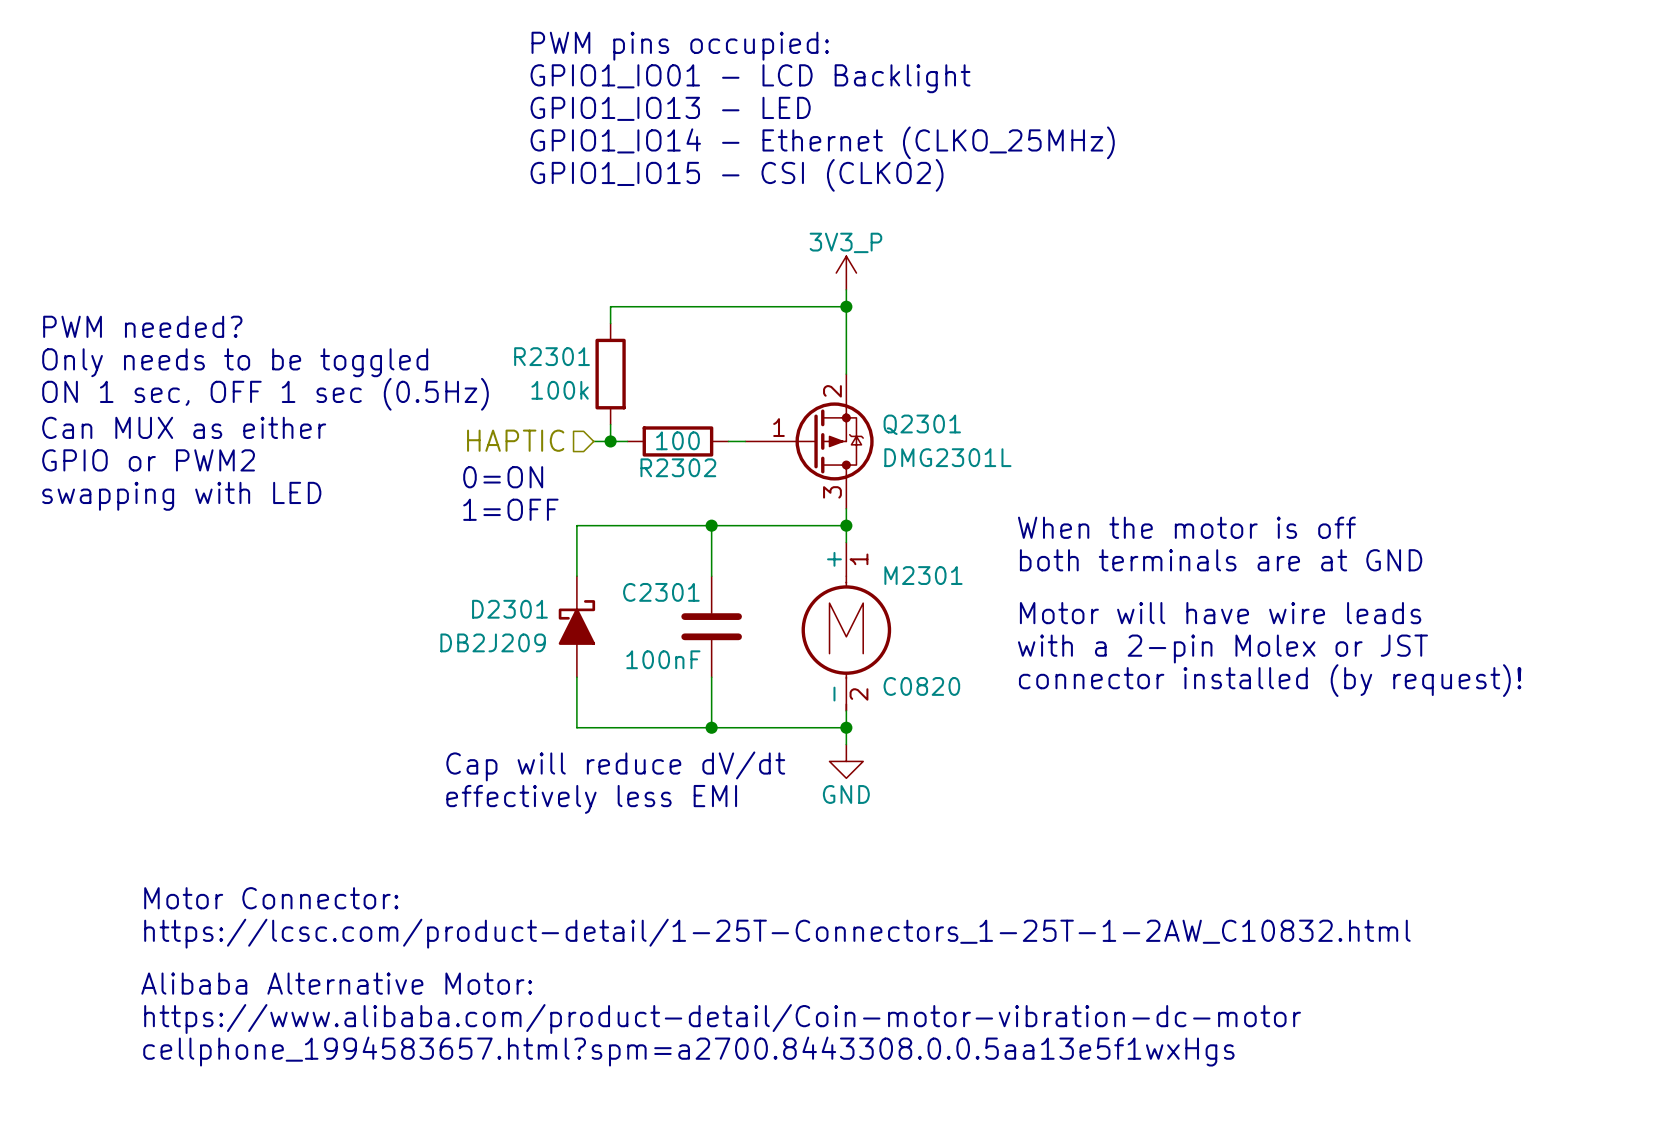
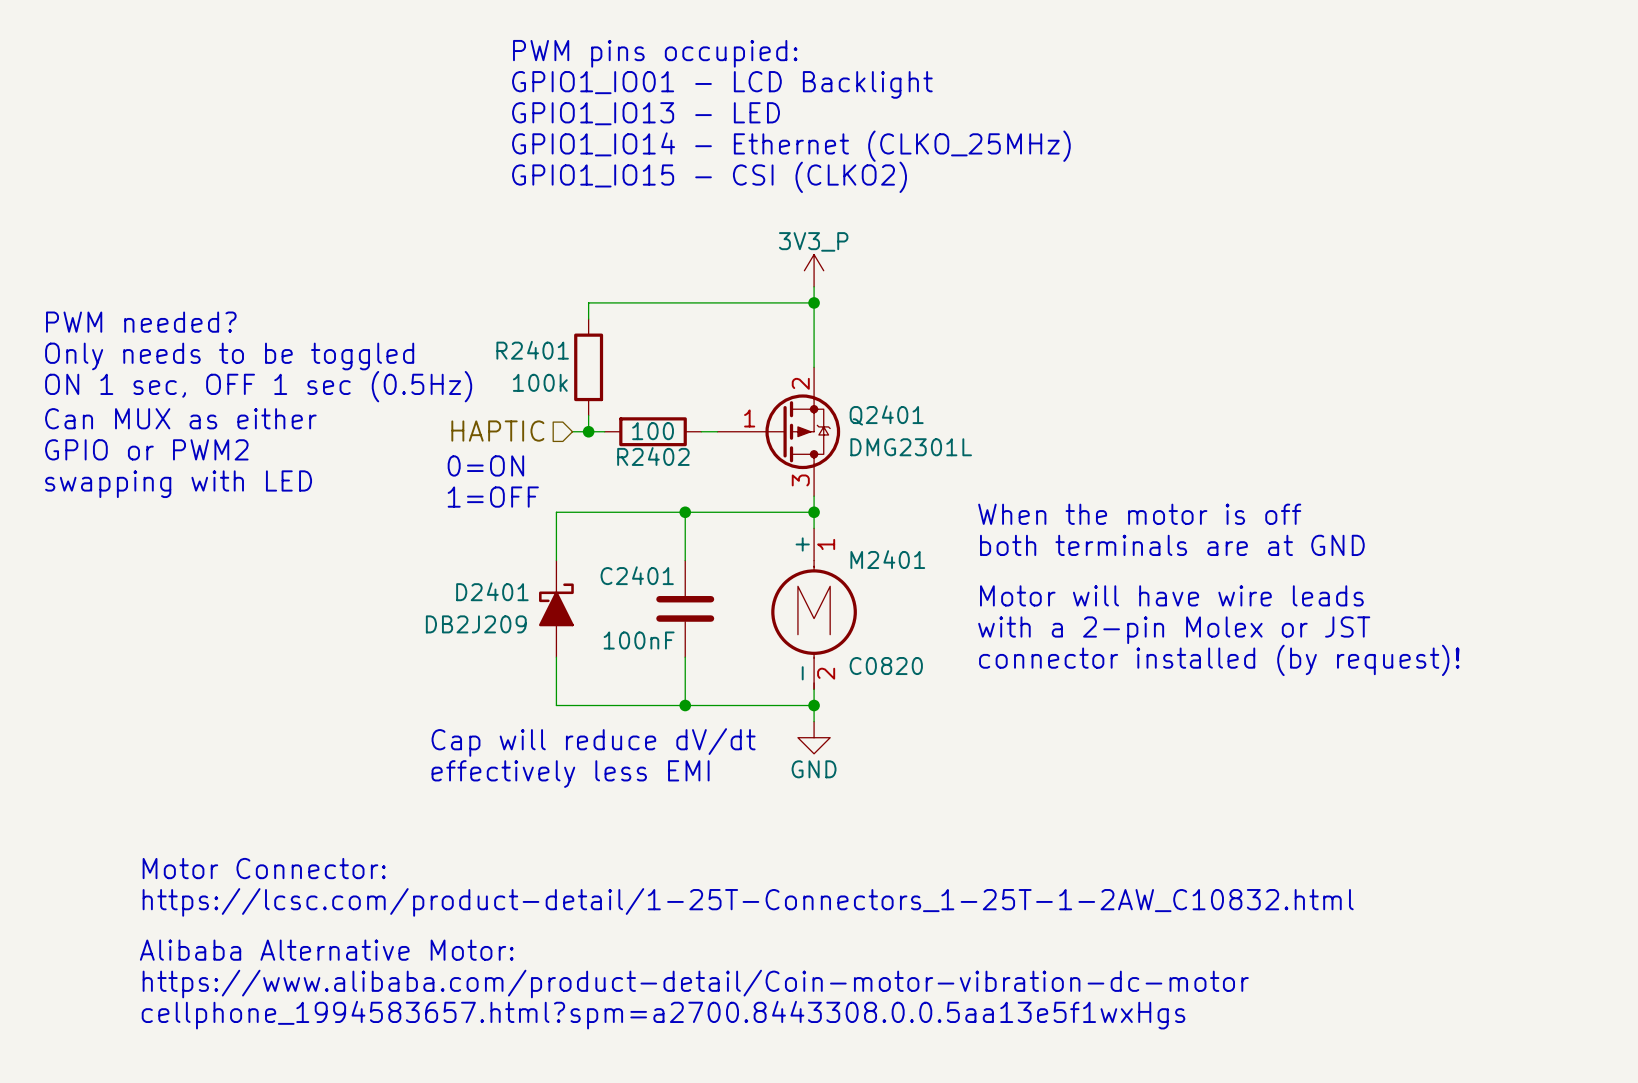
R2301 name: R2301 (552, 356) -> R2401 (532, 350)
Q2301 name: Q2301 (922, 424) -> Q2401 (886, 415)
R2302 name: R2302 (678, 467) -> R2402 (653, 456)
M2301 name: M2301 (923, 575) -> M2401 (887, 559)
C2301 name: C2301 (661, 592) -> C2401 (637, 575)
D2301 name: D2301 (509, 609) -> D2401 (492, 591)

